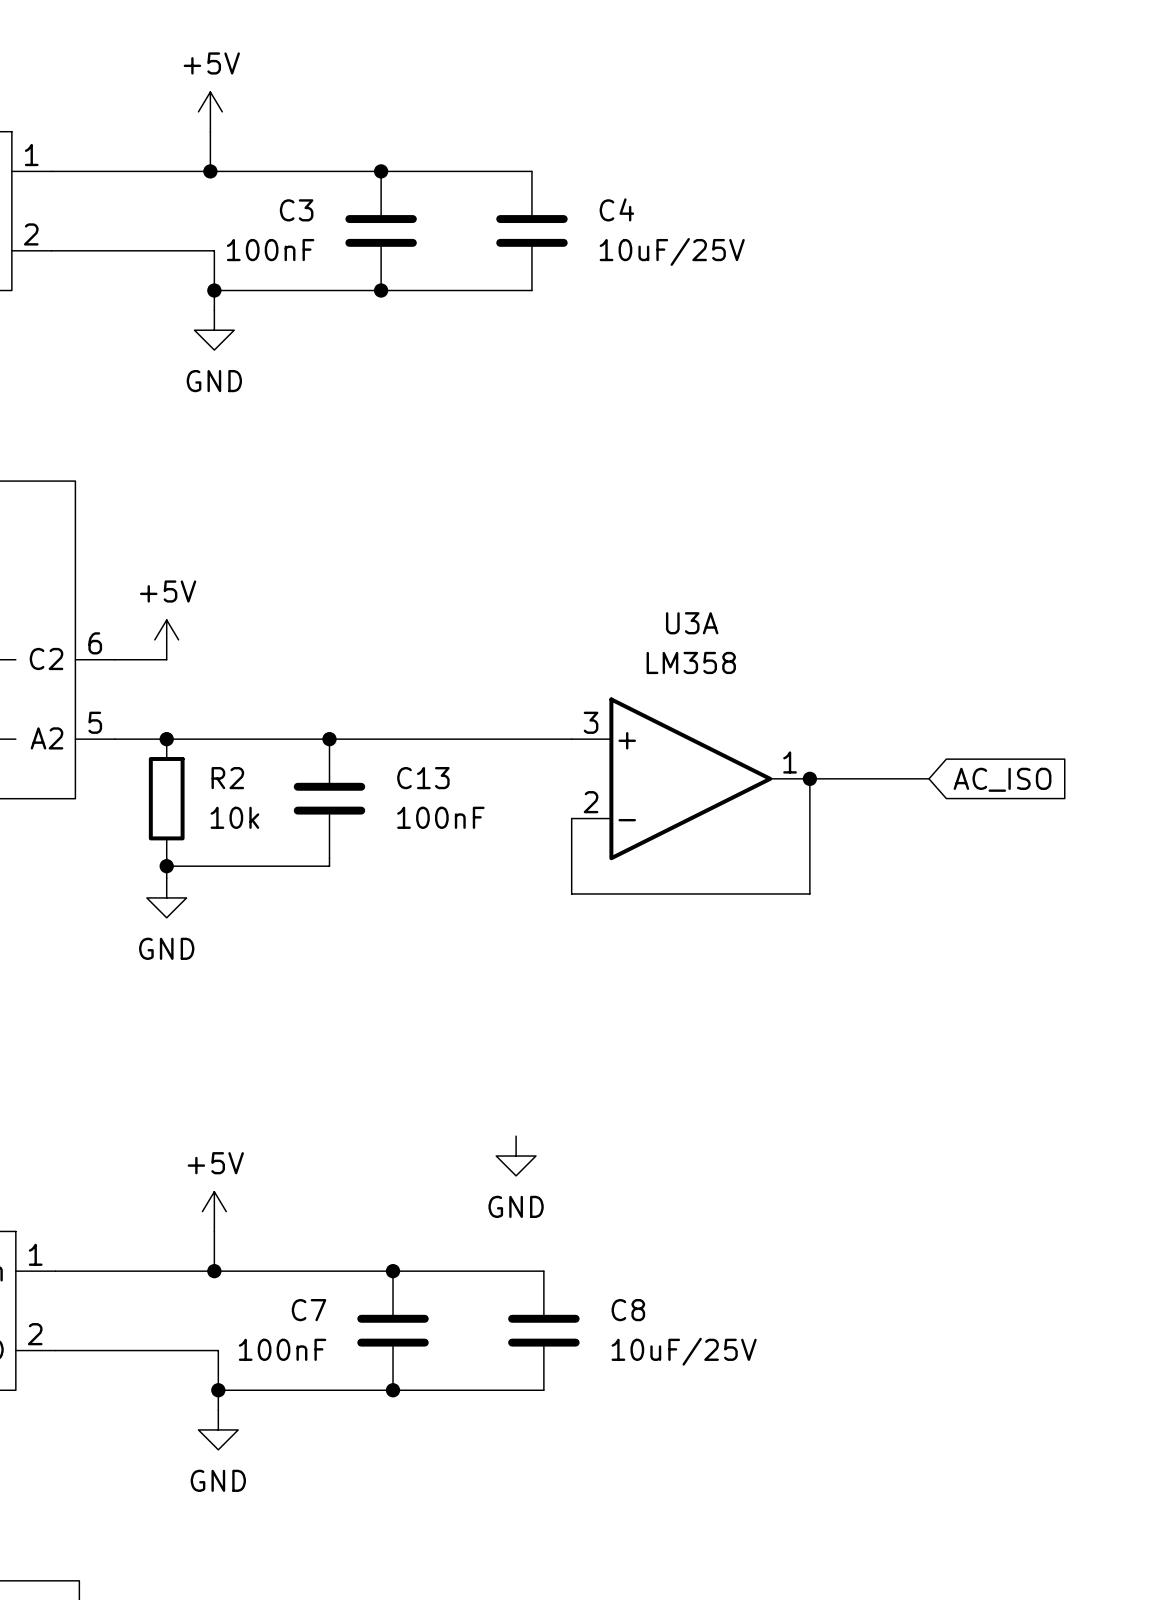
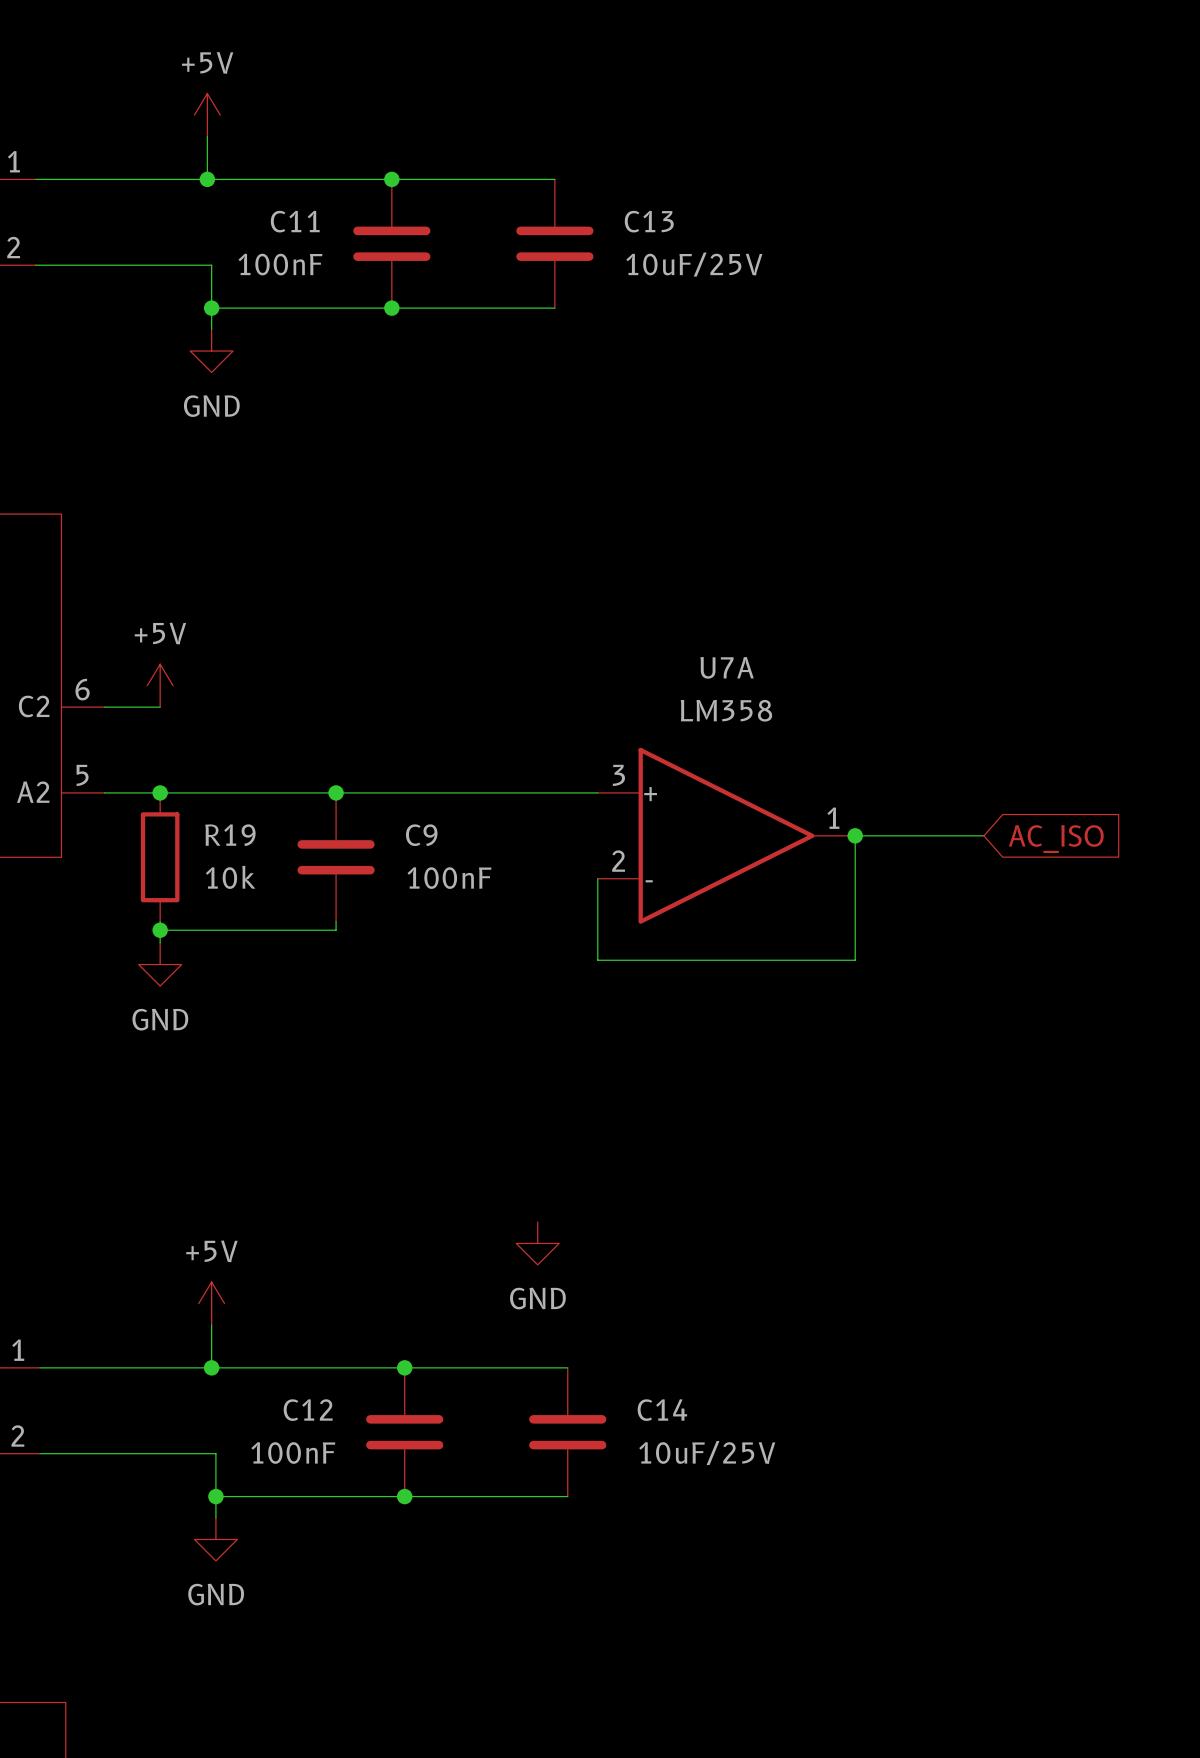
C4 name: C4 (616, 209) -> C13 (649, 221)
C3 name: C3 (296, 210) -> C11 (295, 221)
U3A name: U3A (692, 623) -> U7A (727, 667)
R2 name: R2 (227, 778) -> R19 (230, 835)
C13 name: C13 (423, 778) -> C9 (421, 835)
C7 name: C7 (309, 1310) -> C12 (308, 1410)
C8 name: C8 (628, 1310) -> C14 (662, 1410)

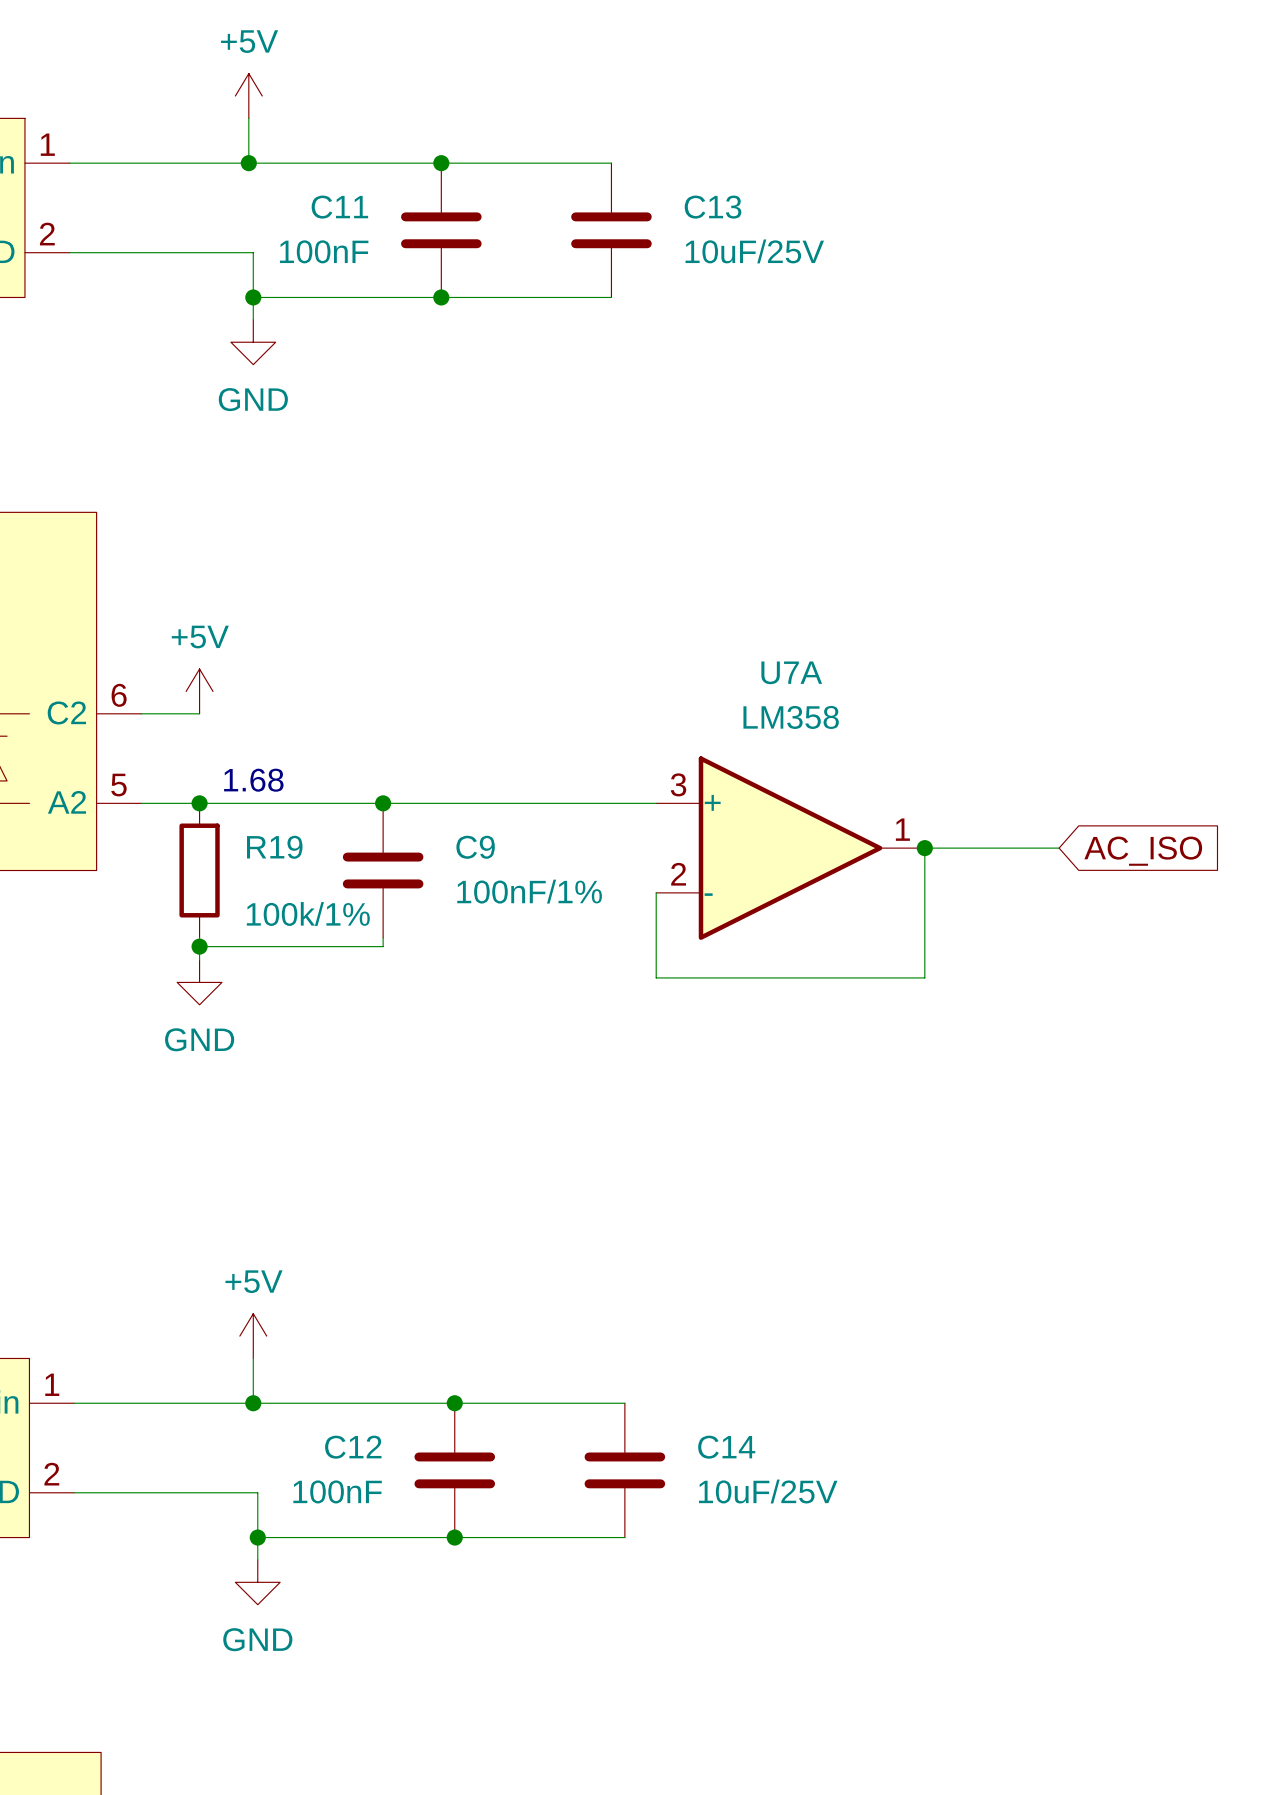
text: none -> 1.68 (253, 780)
R19 value: 10k (230, 877) -> 100k/1% (308, 913)
C9 value: 100nF (449, 878) -> 100nF/1% (529, 891)
power symbol: GND (537, 1243) -> none

